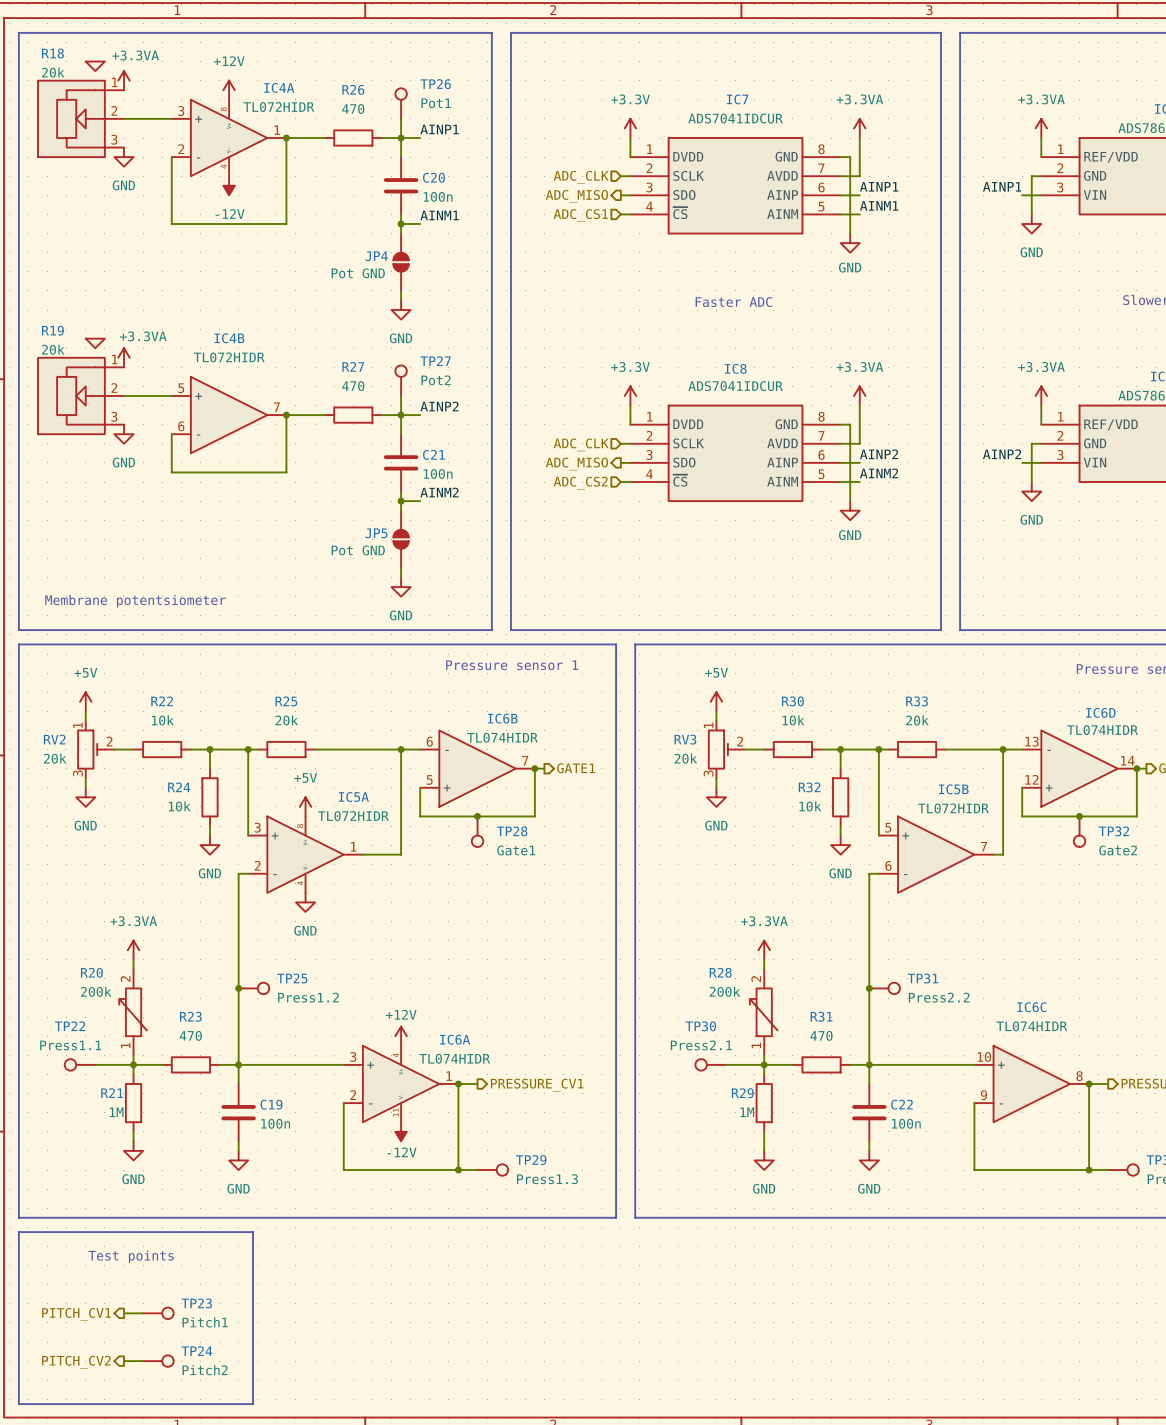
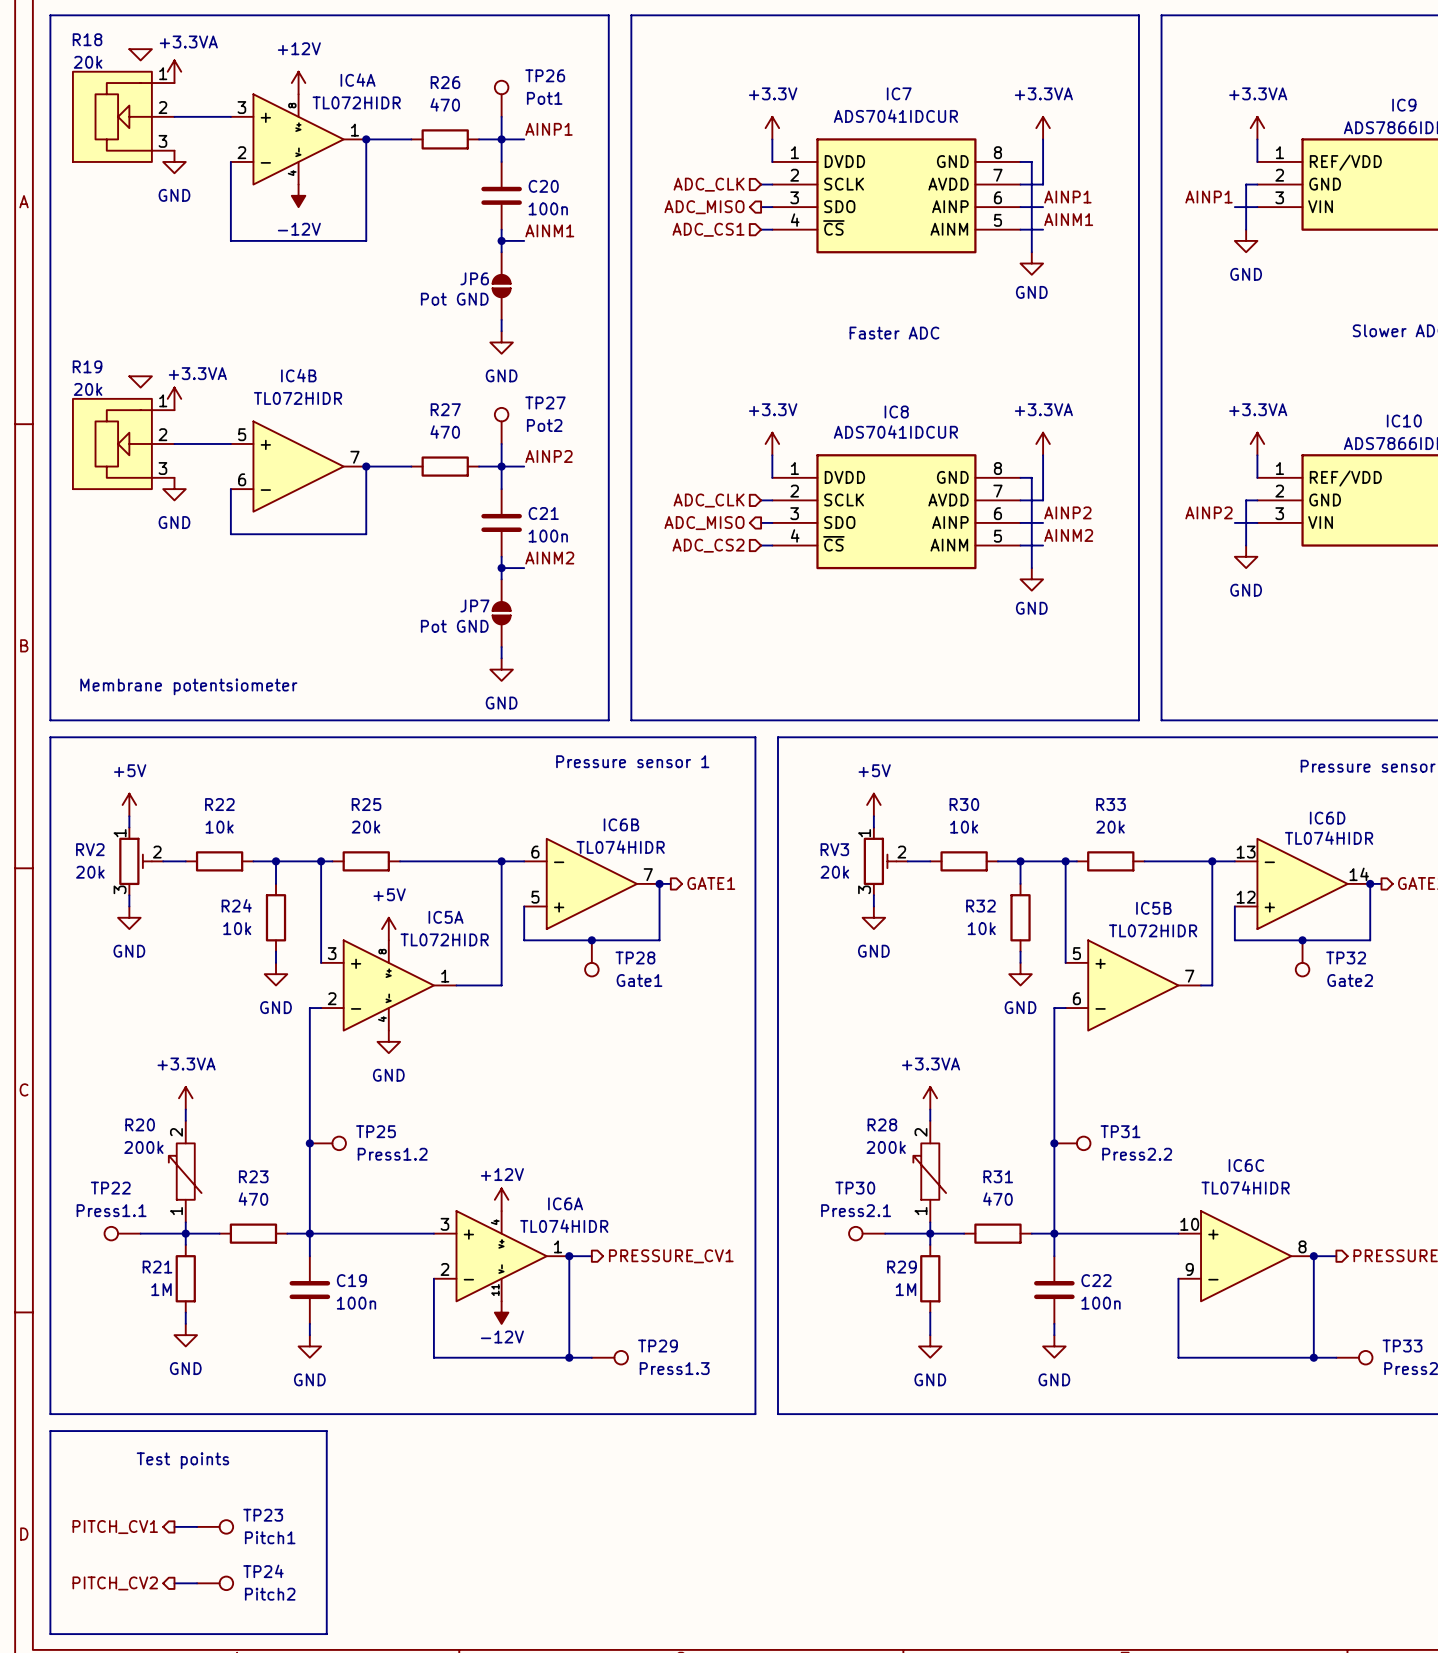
JP4 name: JP4 (376, 256) -> JP6 (474, 278)
JP5 name: JP5 (376, 533) -> JP7 (474, 606)

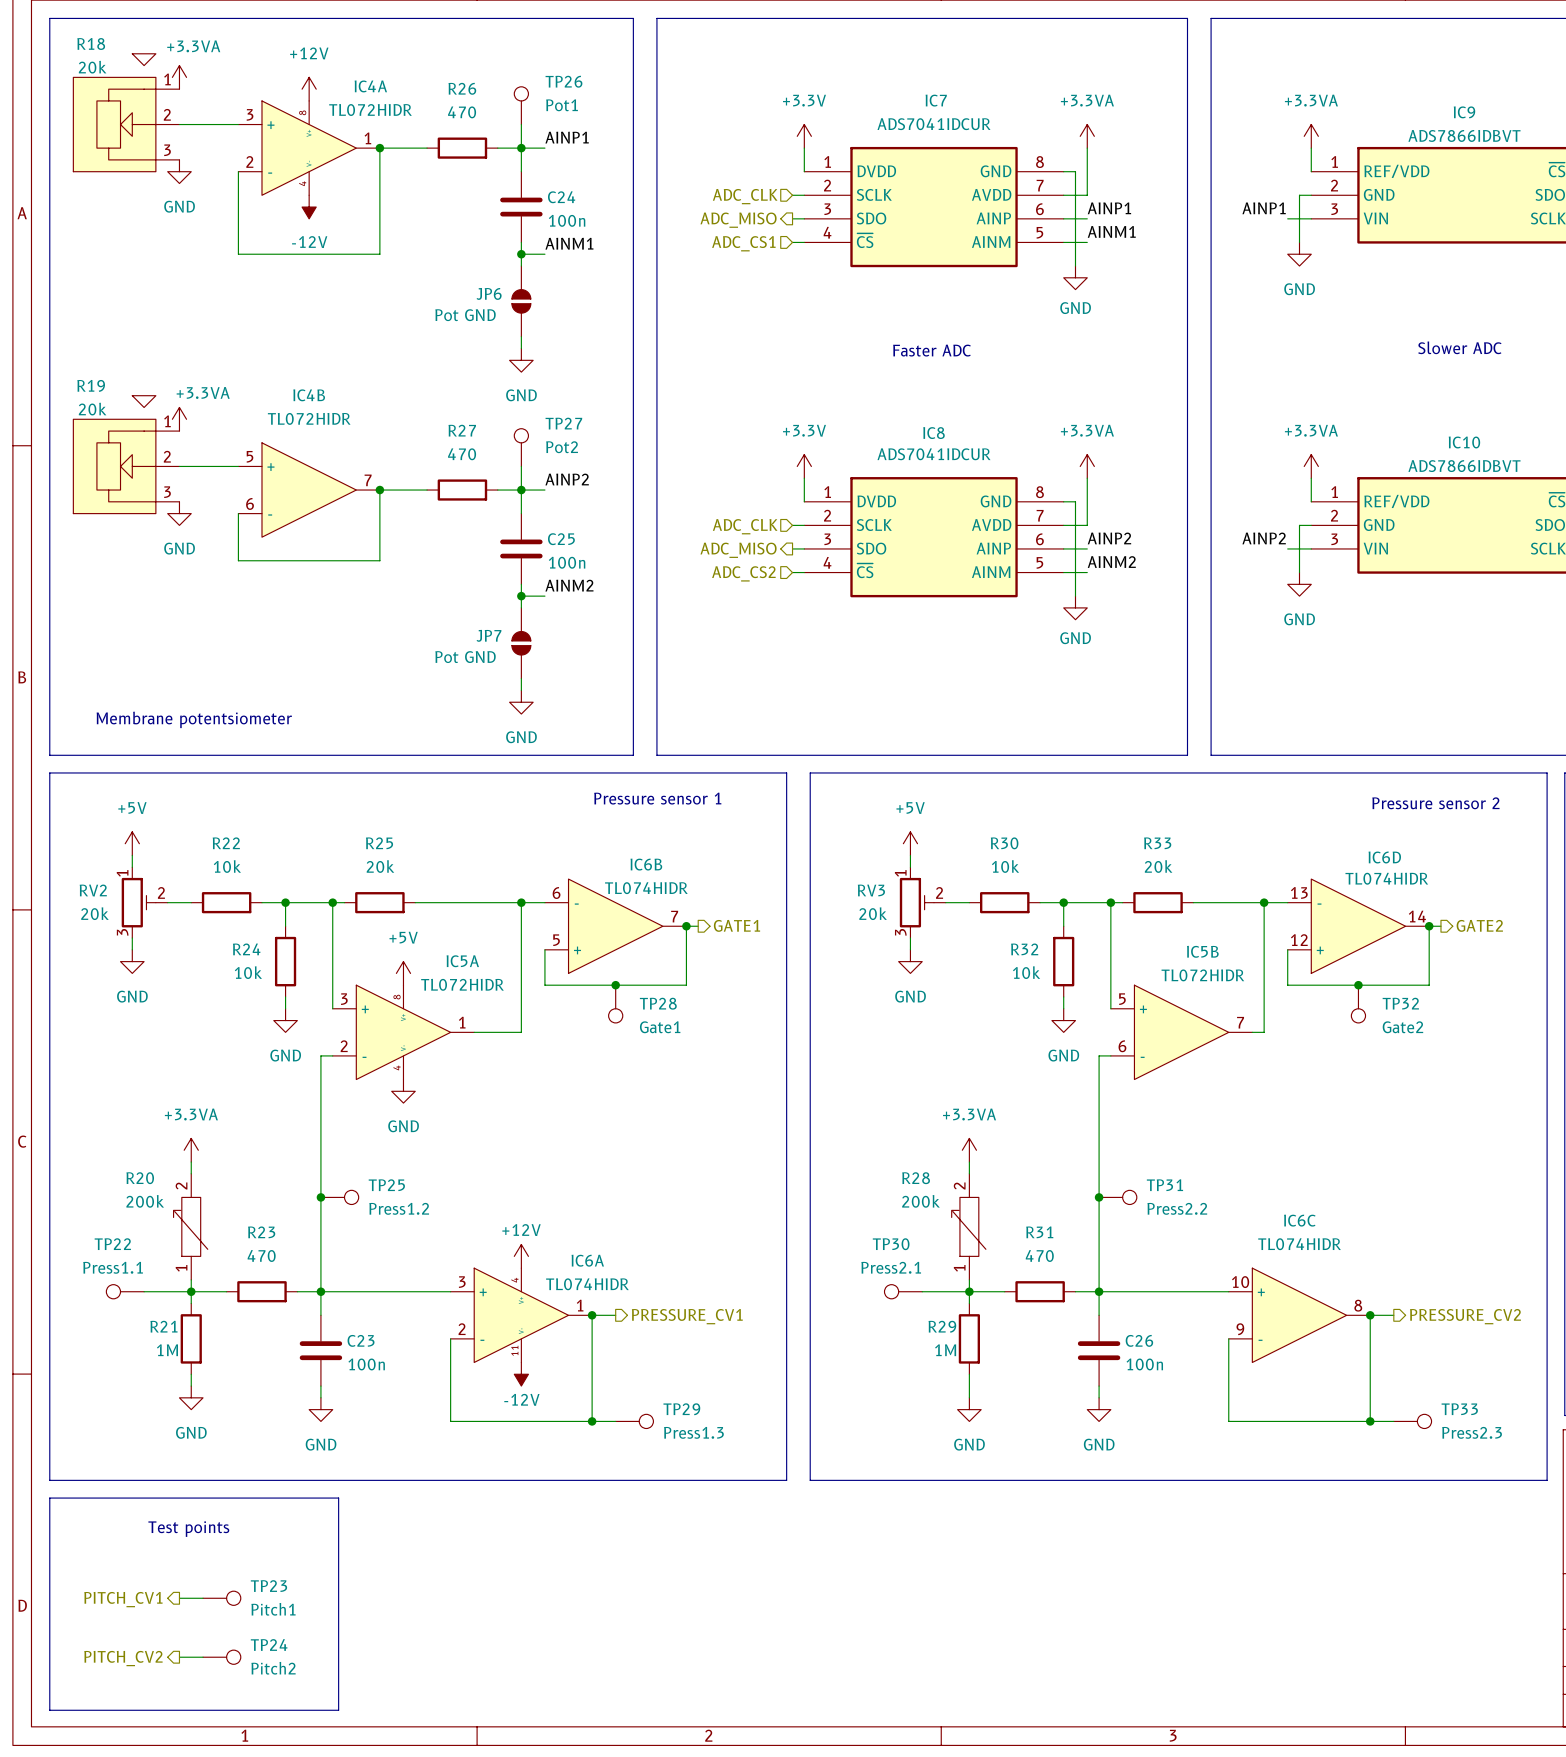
C20 name: C20 (543, 186) -> C24 (561, 197)
C21 name: C21 (543, 513) -> C25 (561, 539)
C19 name: C19 (351, 1280) -> C23 (361, 1340)
C22 name: C22 (1096, 1280) -> C26 (1139, 1340)

